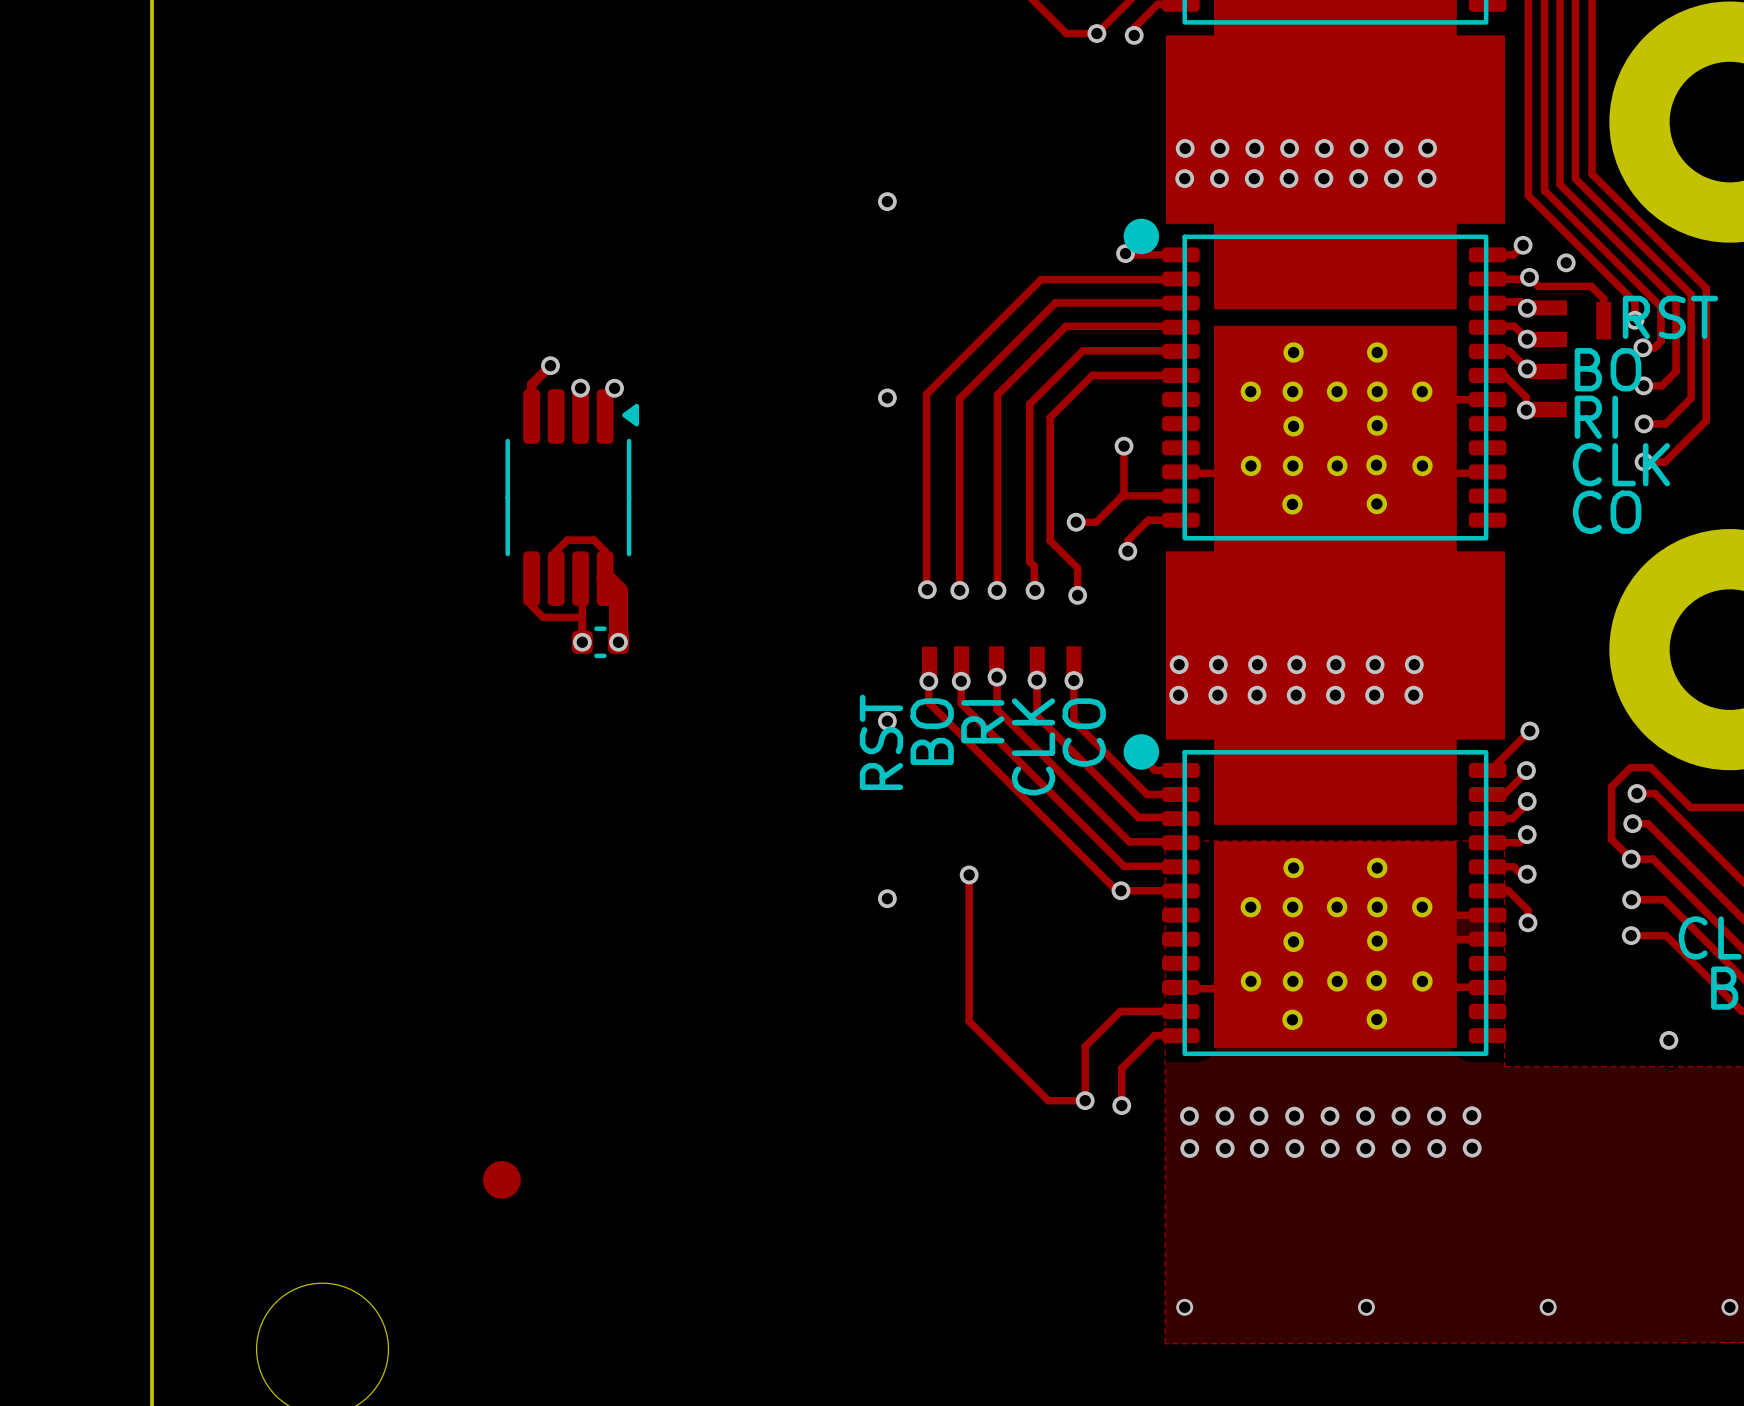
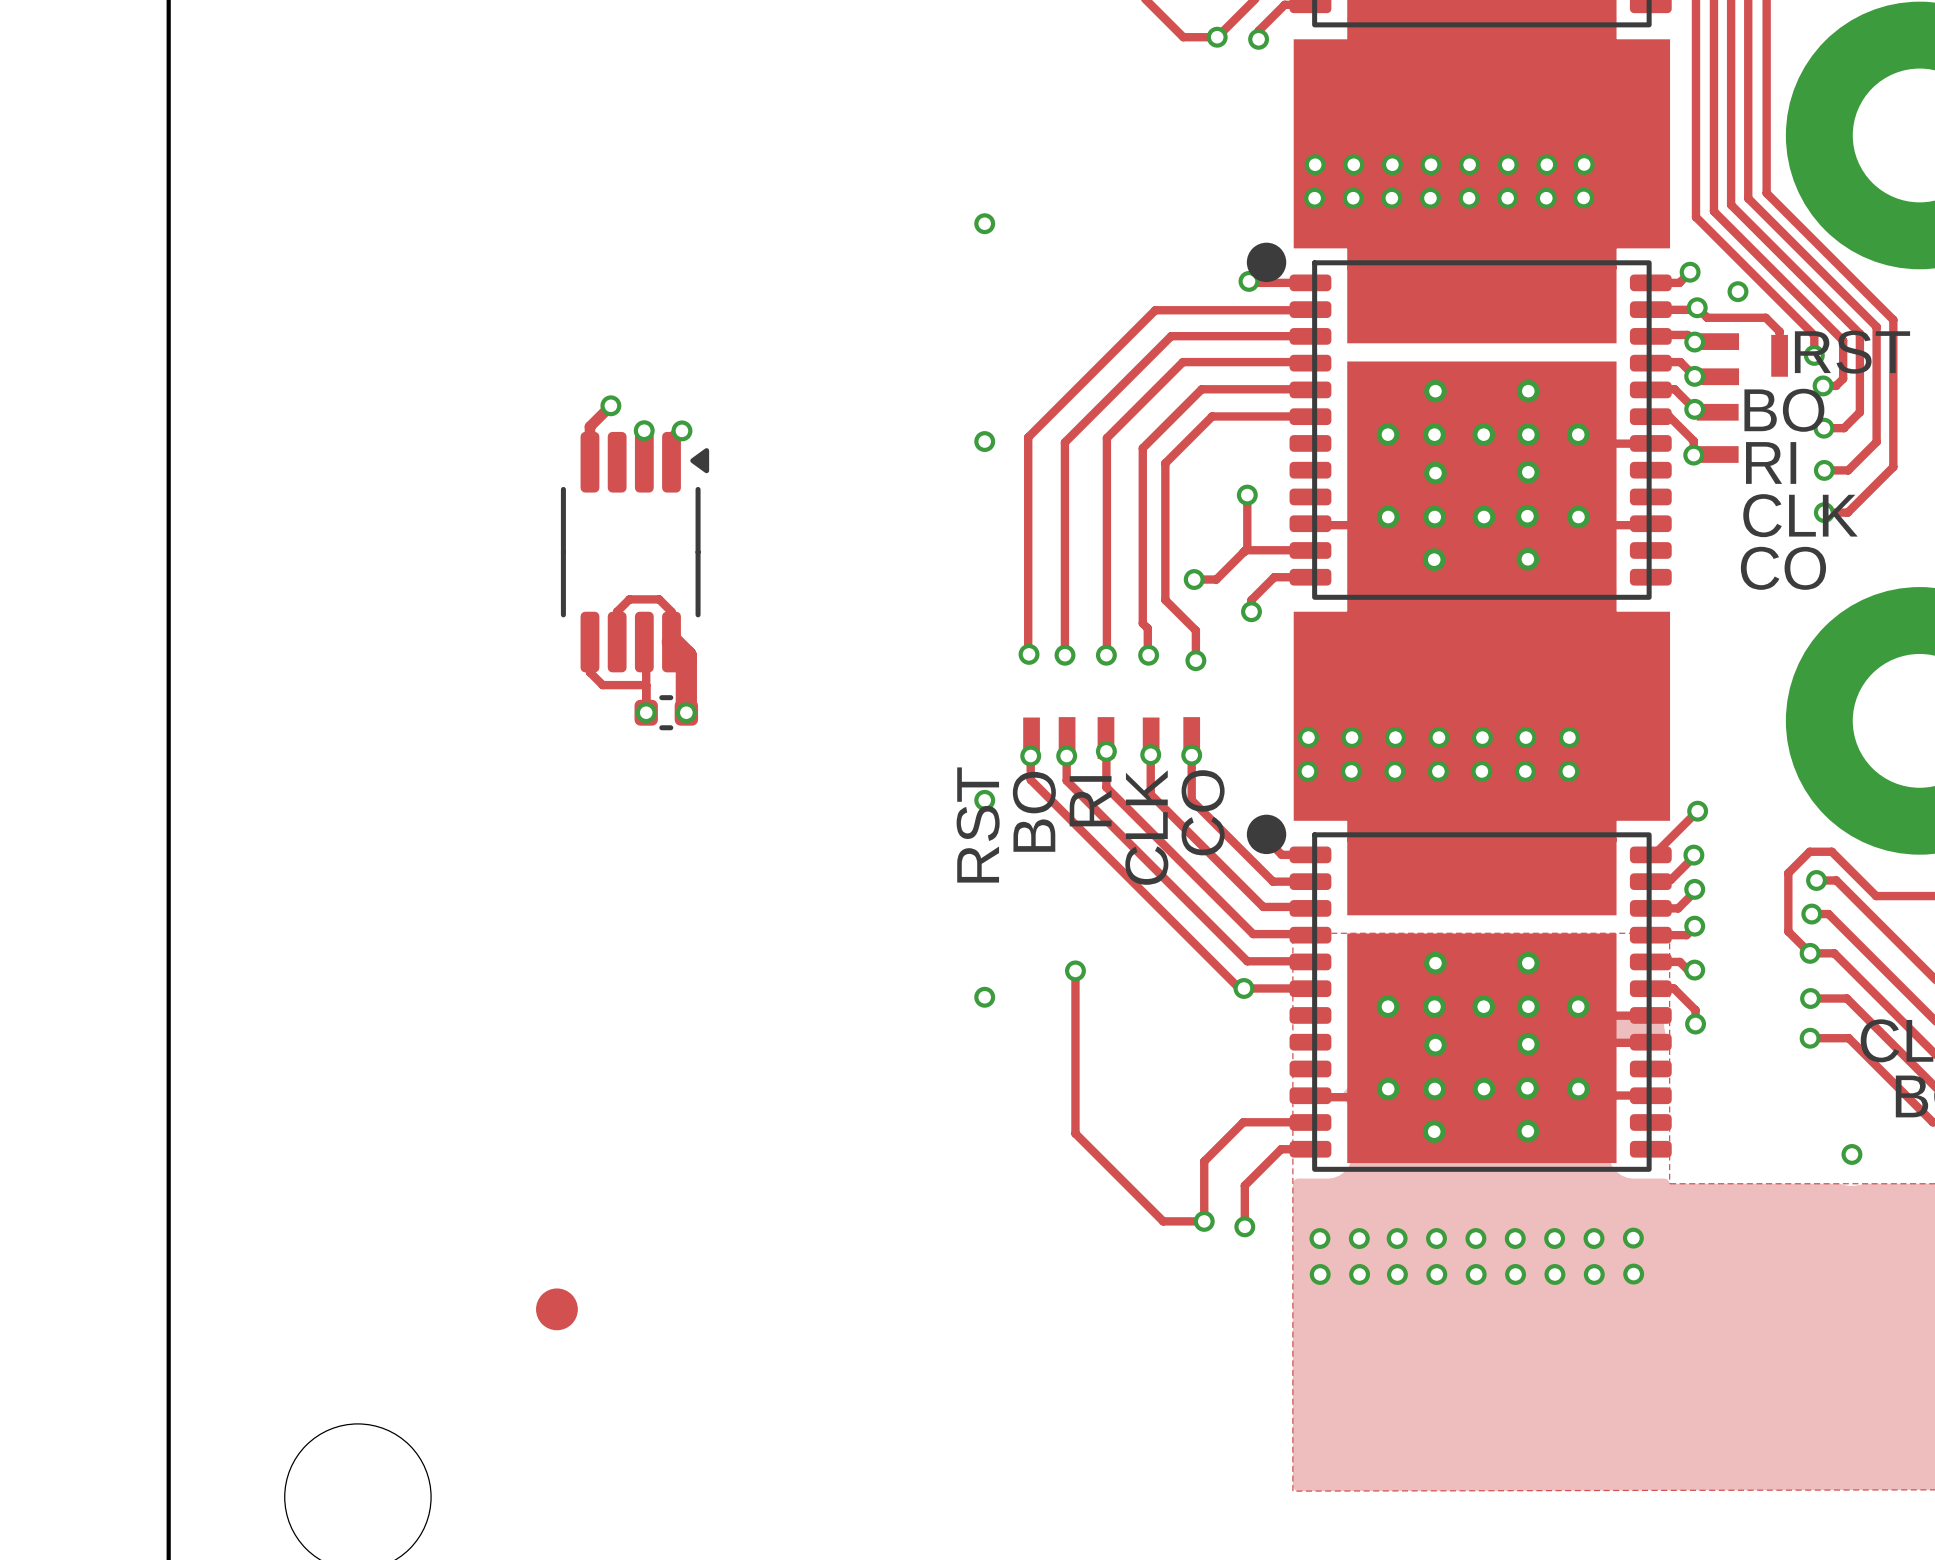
via: (1184, 1307) -> none
via: (1366, 1307) -> none
via: (1548, 1307) -> none
via: (1729, 1307) -> none

